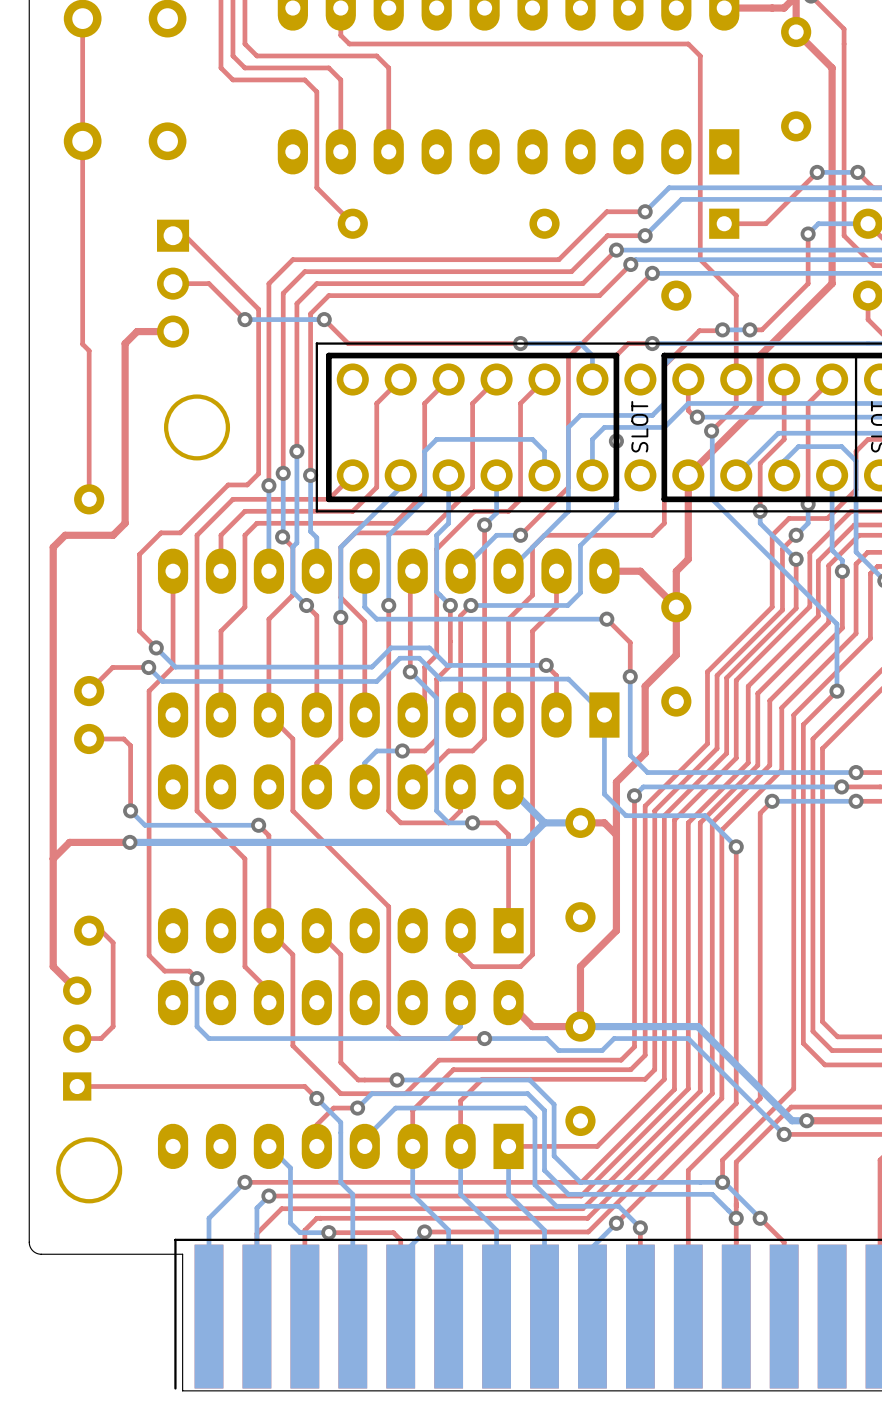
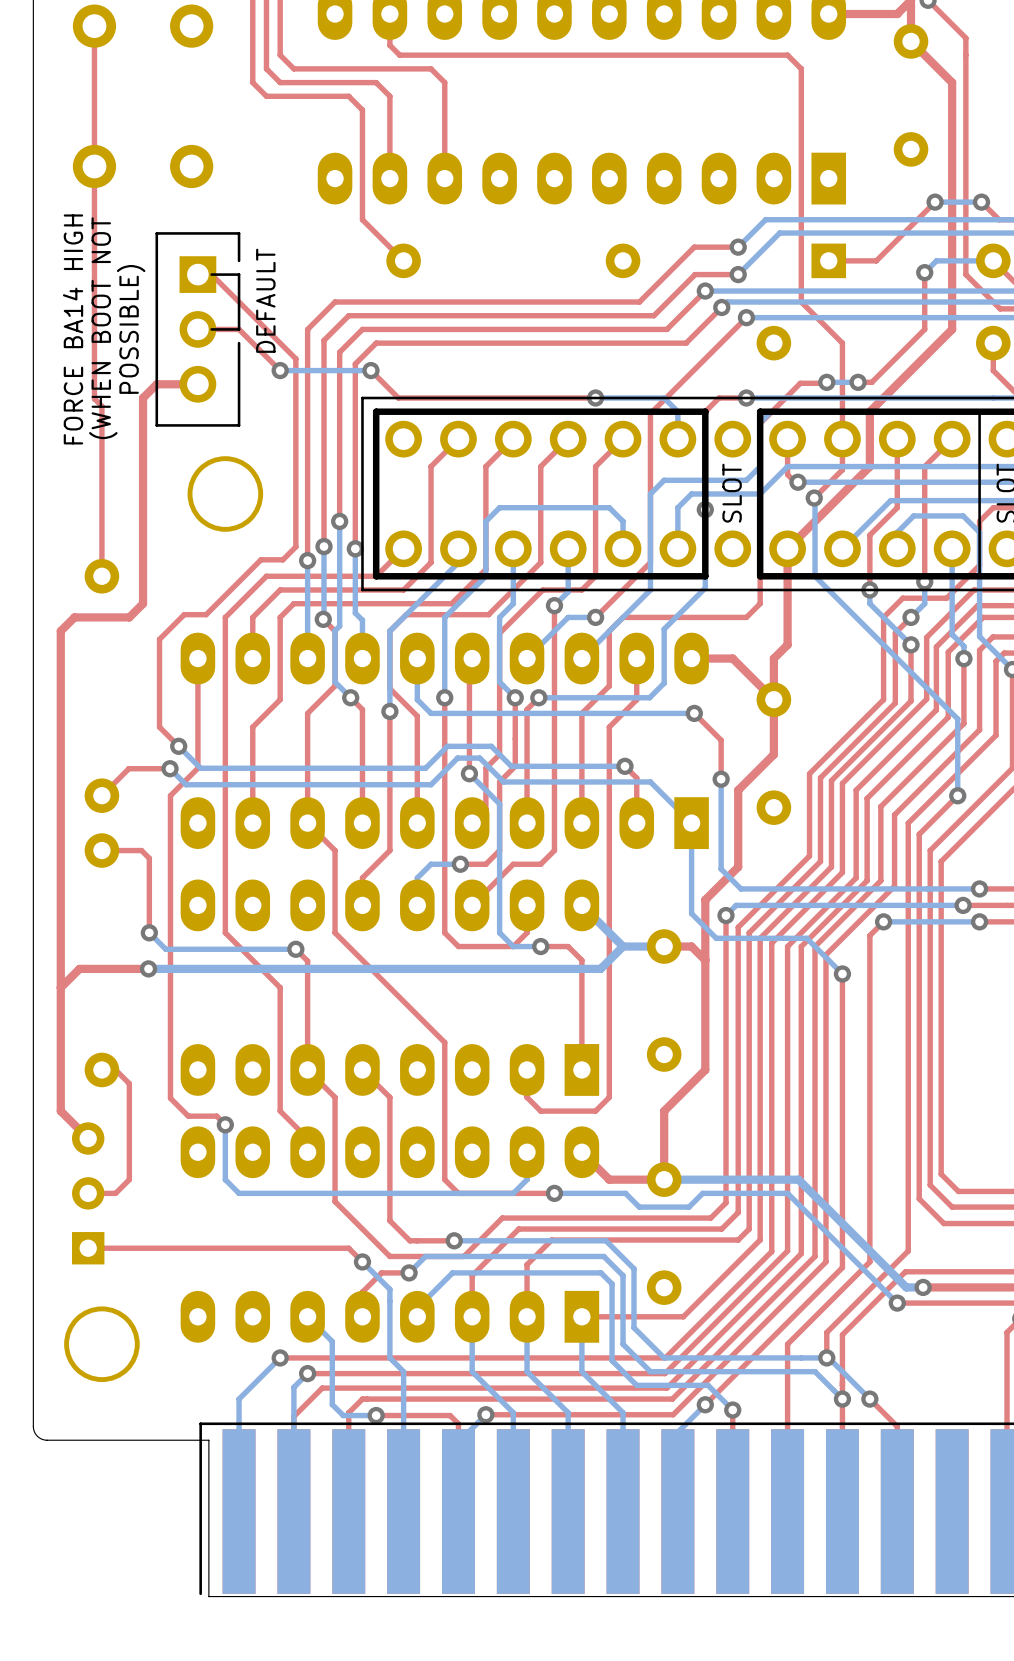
line: none -> (239, 260) (239, 233) (156, 233) (156, 425) (239, 425) (239, 343)
line: none -> (211, 274) (239, 274) (239, 329) (211, 329)
text: none -> DEFAULT (265, 300)
text: none -> (WHEN BOOT NOT (103, 328)
text: none -> FORCE BA14 HIGH (73, 329)
text: none -> POSSIBLE) (131, 329)

